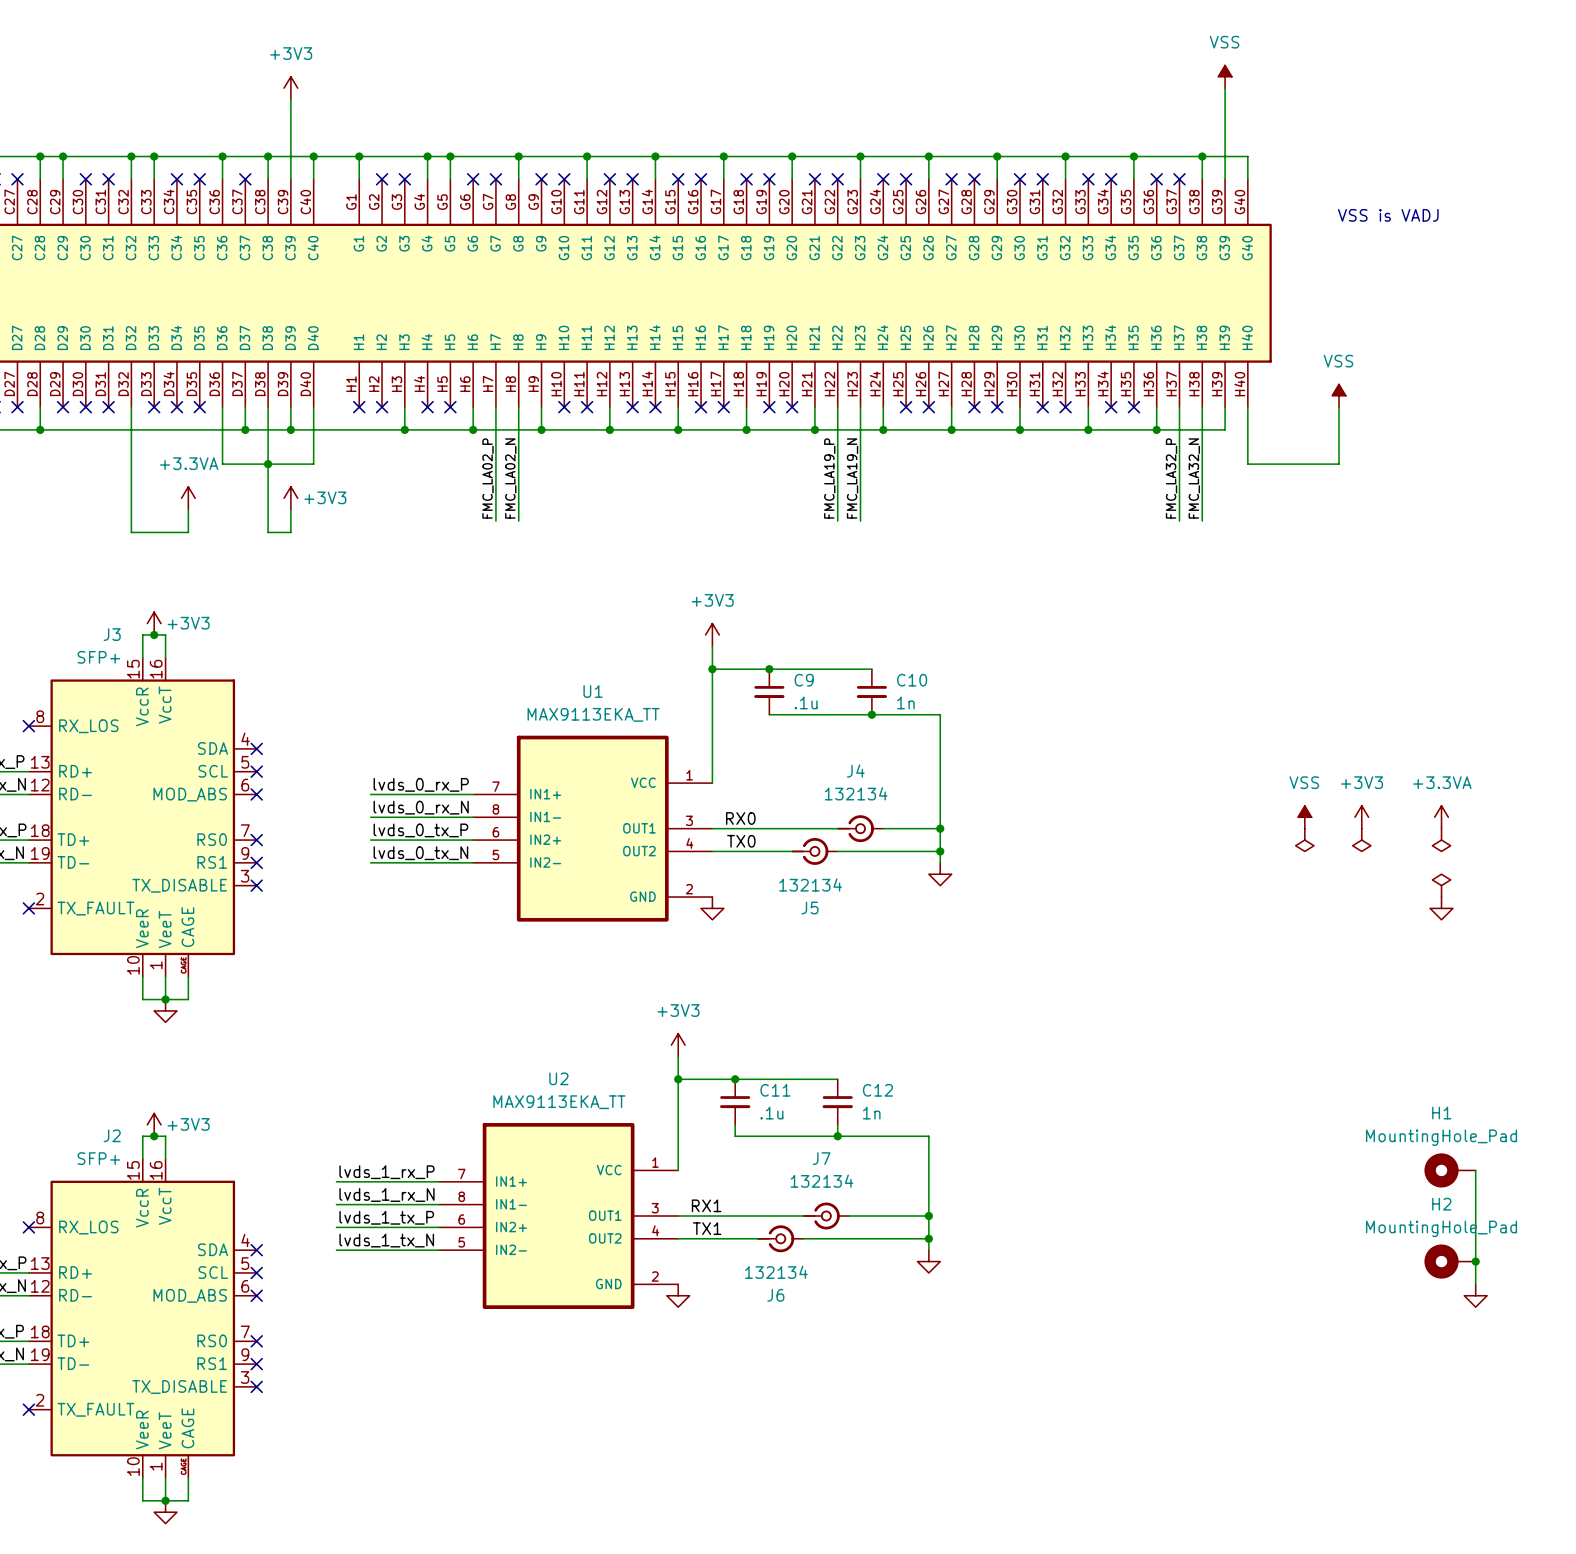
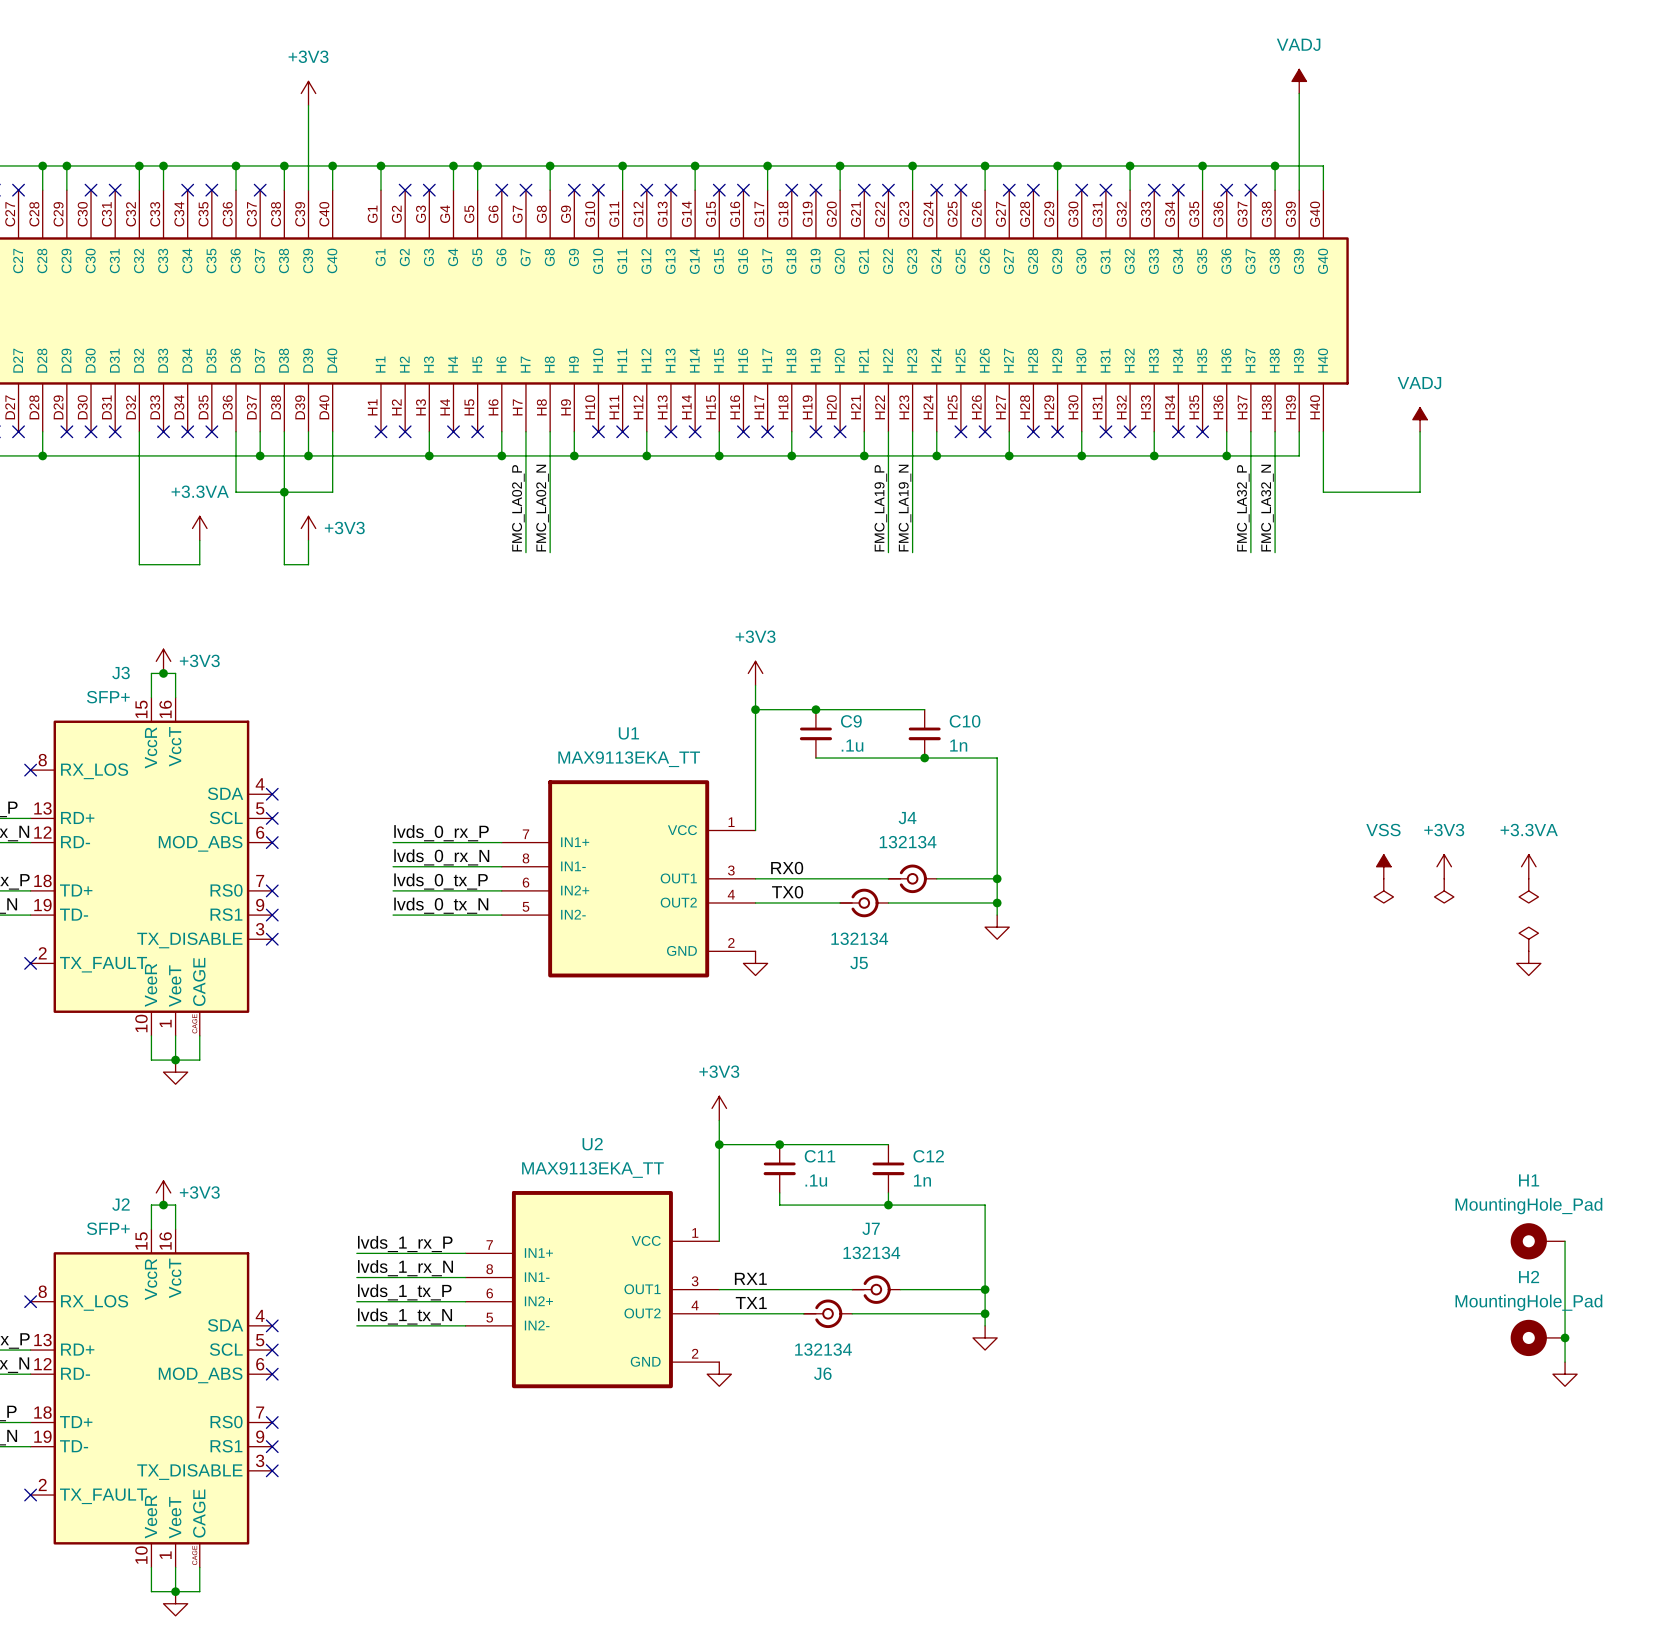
power symbol: VSS (1225, 76) -> VADJ (1299, 81)
text: VSS is VADJ (1388, 215) -> none
power symbol: VSS (1338, 395) -> VADJ (1420, 419)

